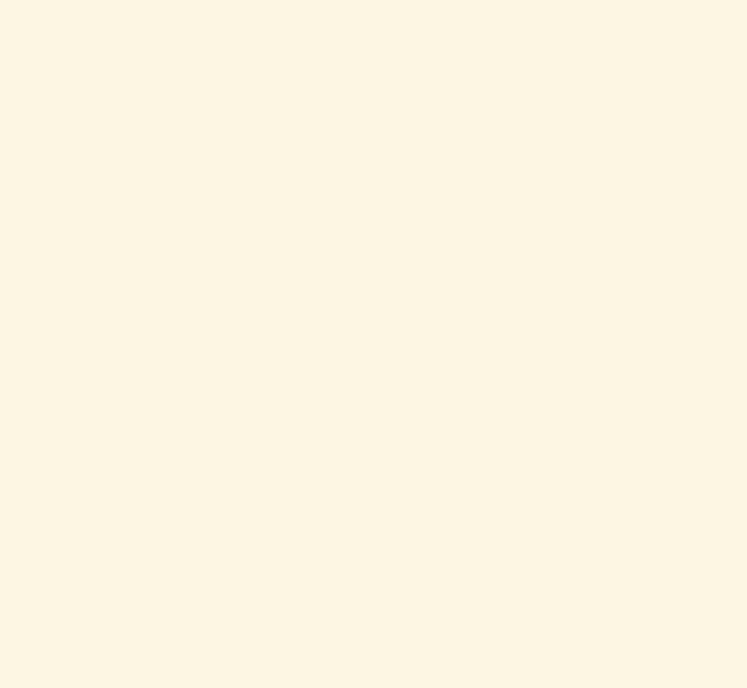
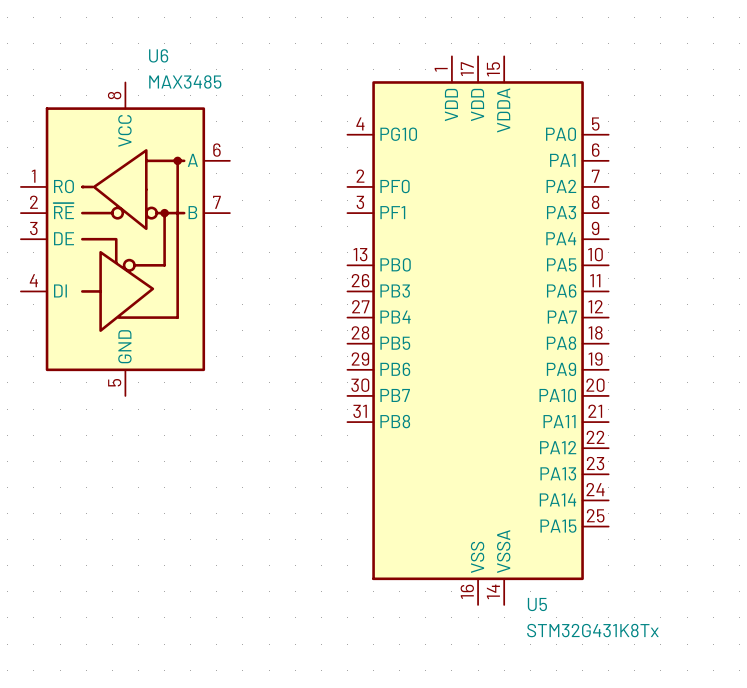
U6: none -> MAX3485 (125, 239)
U5: none -> STM32G431K8Tx (478, 330)

